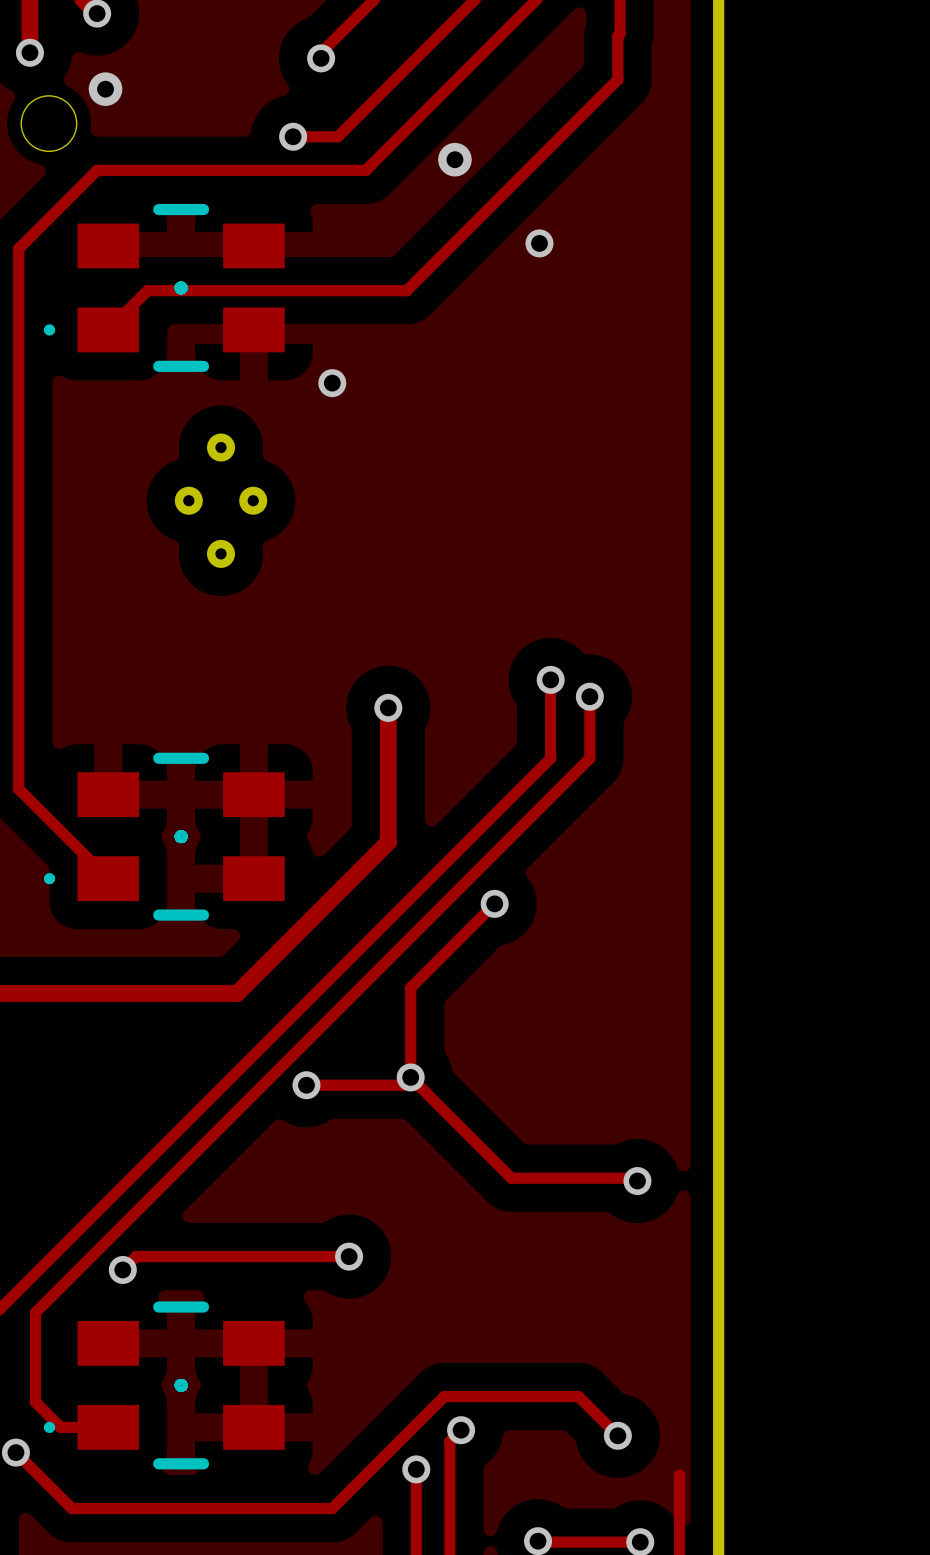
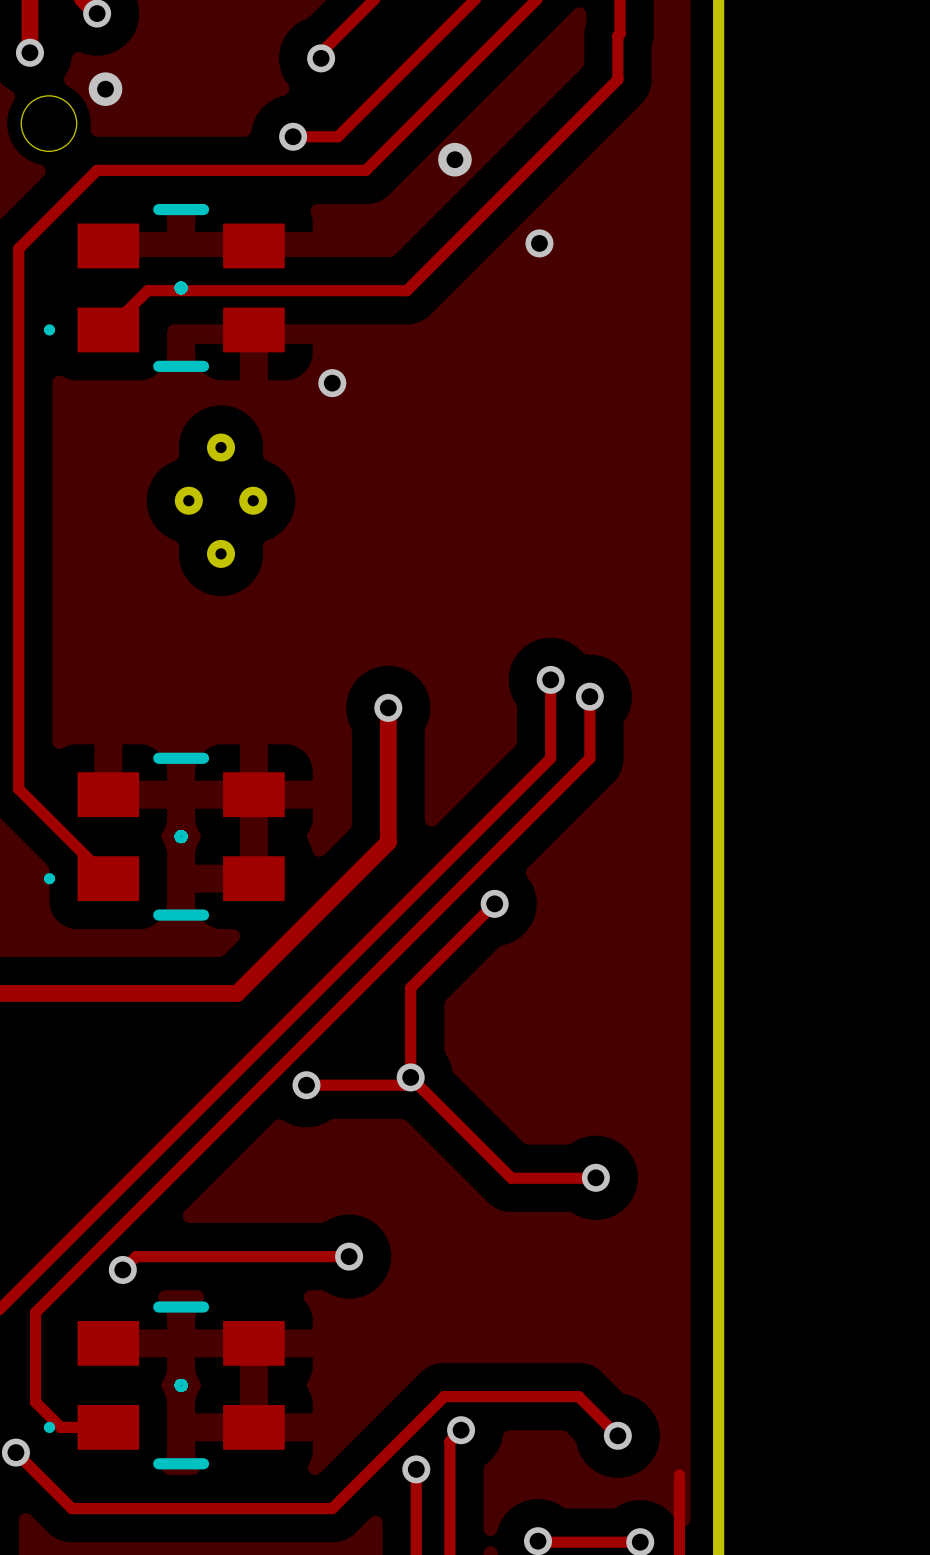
track: (595, 1178) (626, 1178) (629, 1181) (637, 1181) -> none
via position: (637, 1181) -> (595, 1177)

